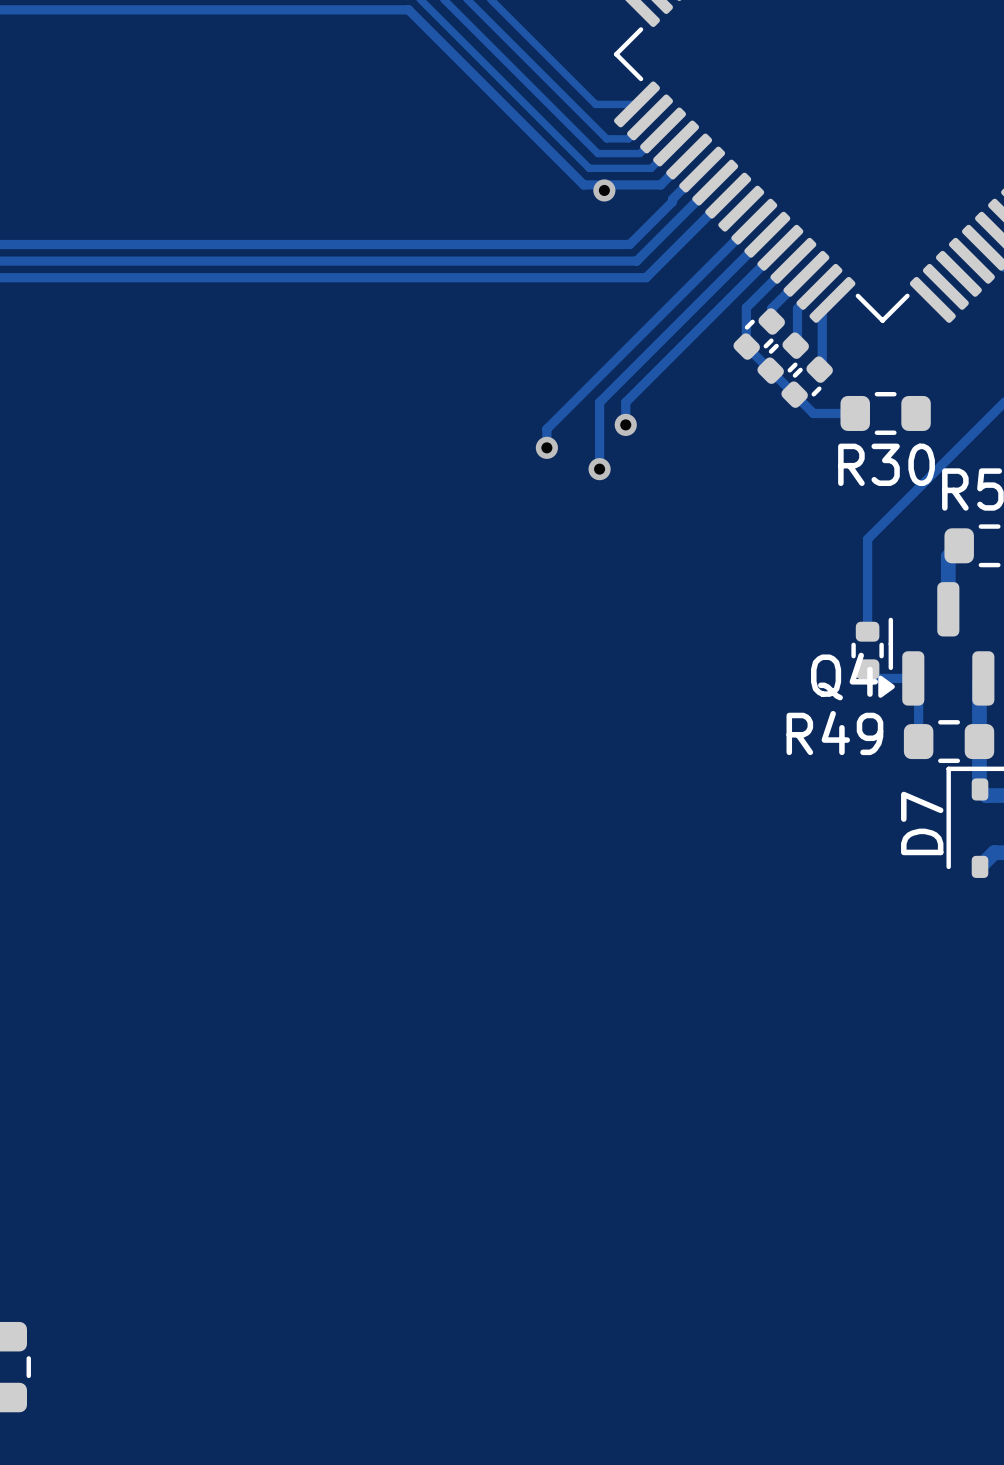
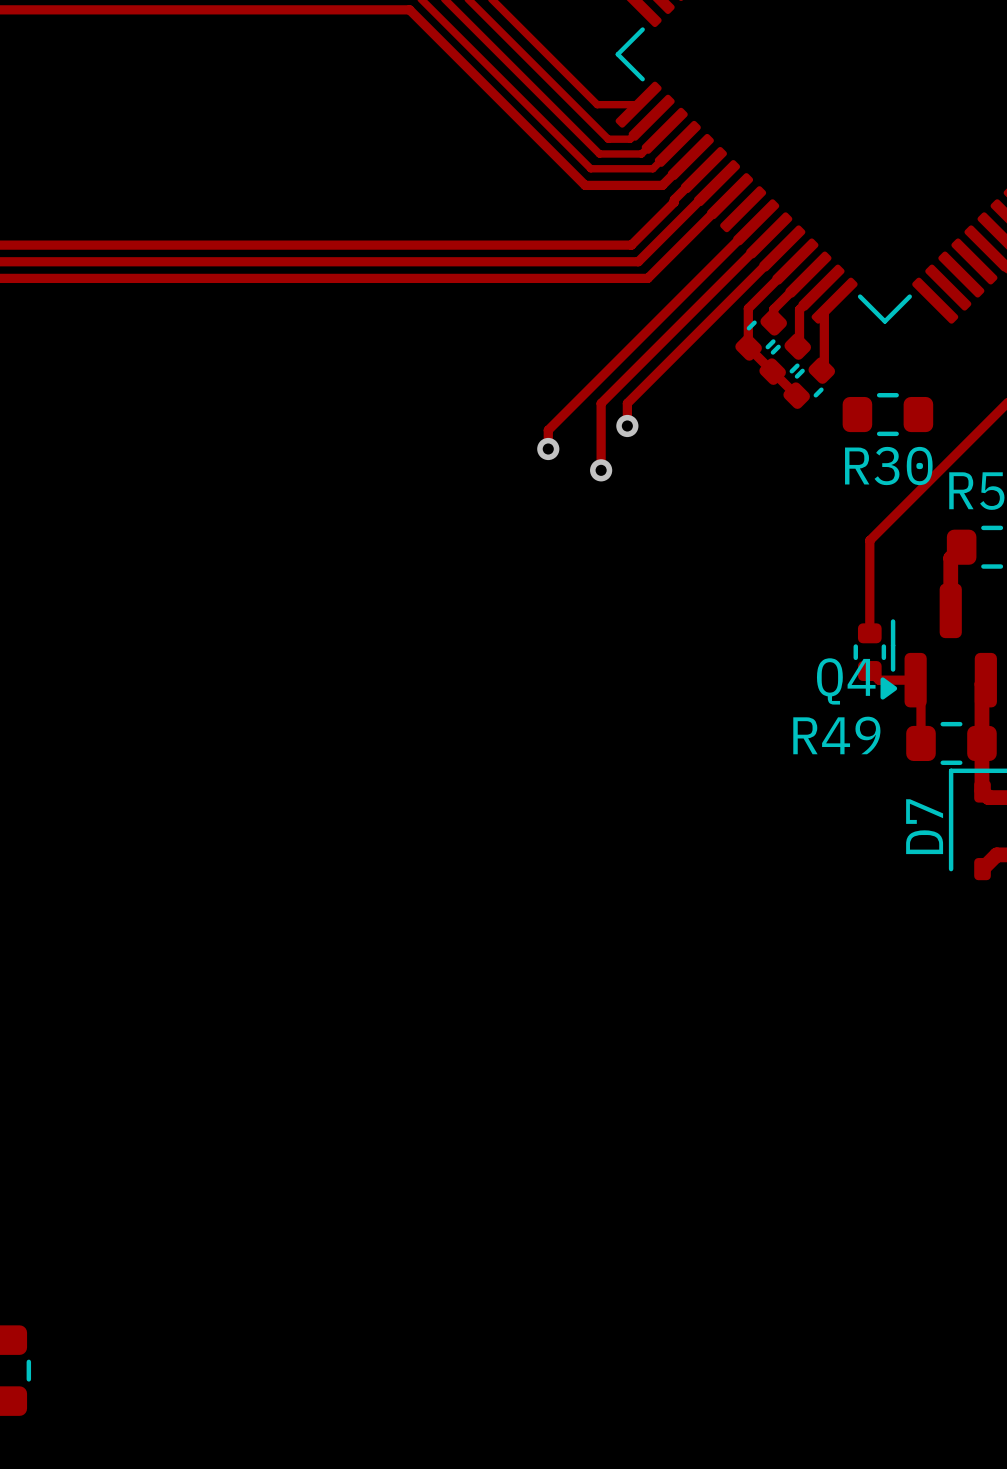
via: (604, 190) -> none
track: (794, 394) (813, 413) (855, 413) -> none

